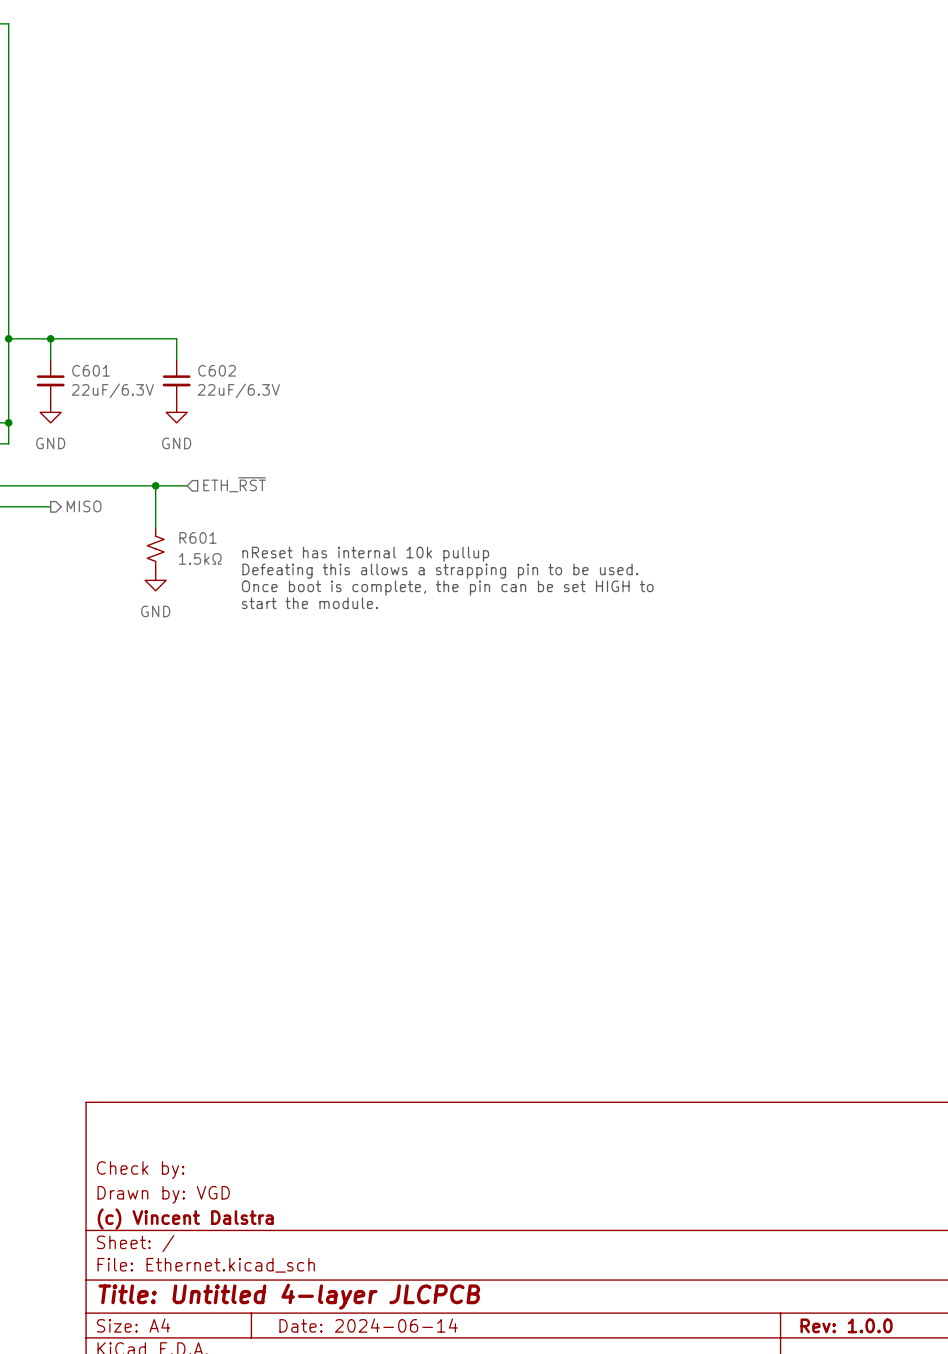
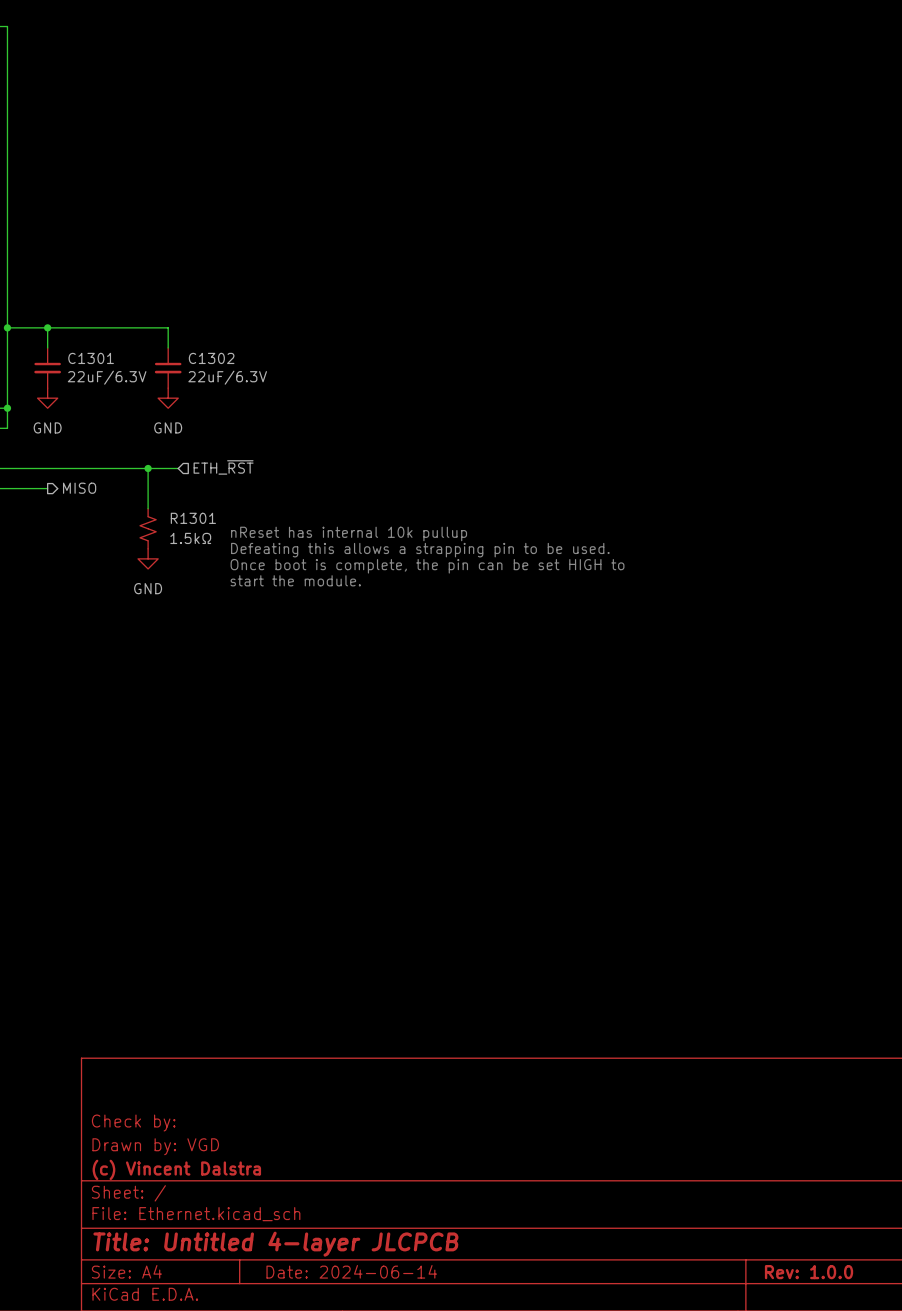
C601 name: C601 (91, 370) -> C1301 (91, 358)
C602 name: C602 (217, 370) -> C1302 (211, 358)
R601 name: R601 (198, 537) -> R1301 (193, 518)

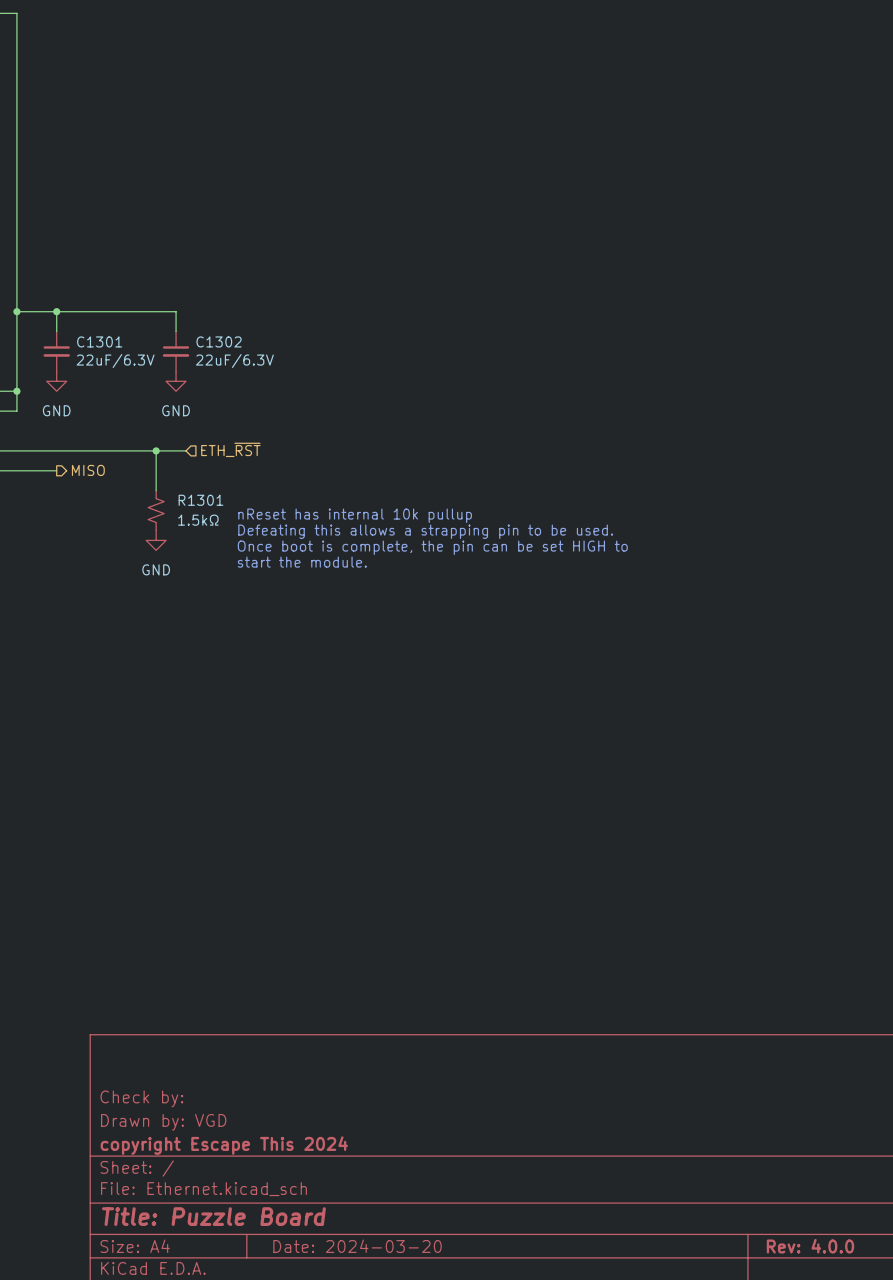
title block: (c) Vincent Dalstra (176, 1169) -> copyright Escape This 2024 (224, 1145)
title block: Title: Untitled 4-layer JLCPCB (275, 1244) -> Title: Puzzle Board (213, 1216)
title block: Date: 2024-06-14 (351, 1271) -> Date: 2024-03-20 (357, 1246)
title block: Rev: 1.0.0 (809, 1272) -> Rev: 4.0.0 (810, 1246)

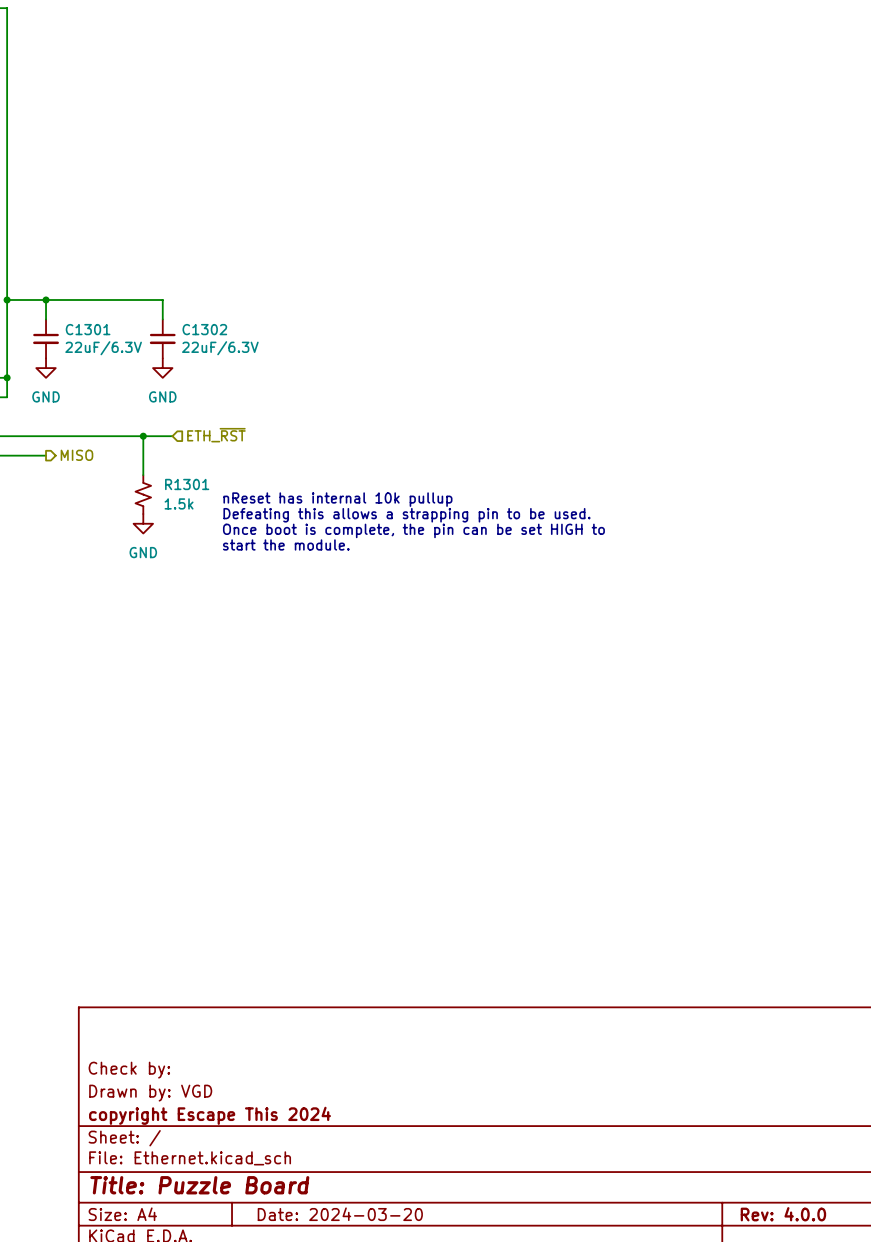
R1301 value: 1.5kΩ (198, 520) -> 1.5k (179, 503)

